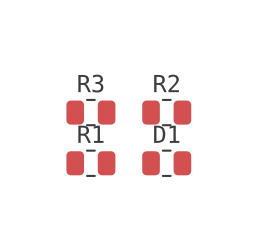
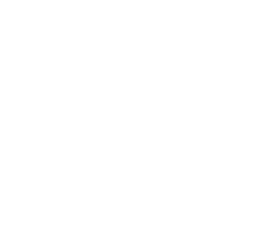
R3: (90, 112) -> none
R2: (166, 112) -> none
R1: (90, 163) -> none
D1: (166, 163) -> none

